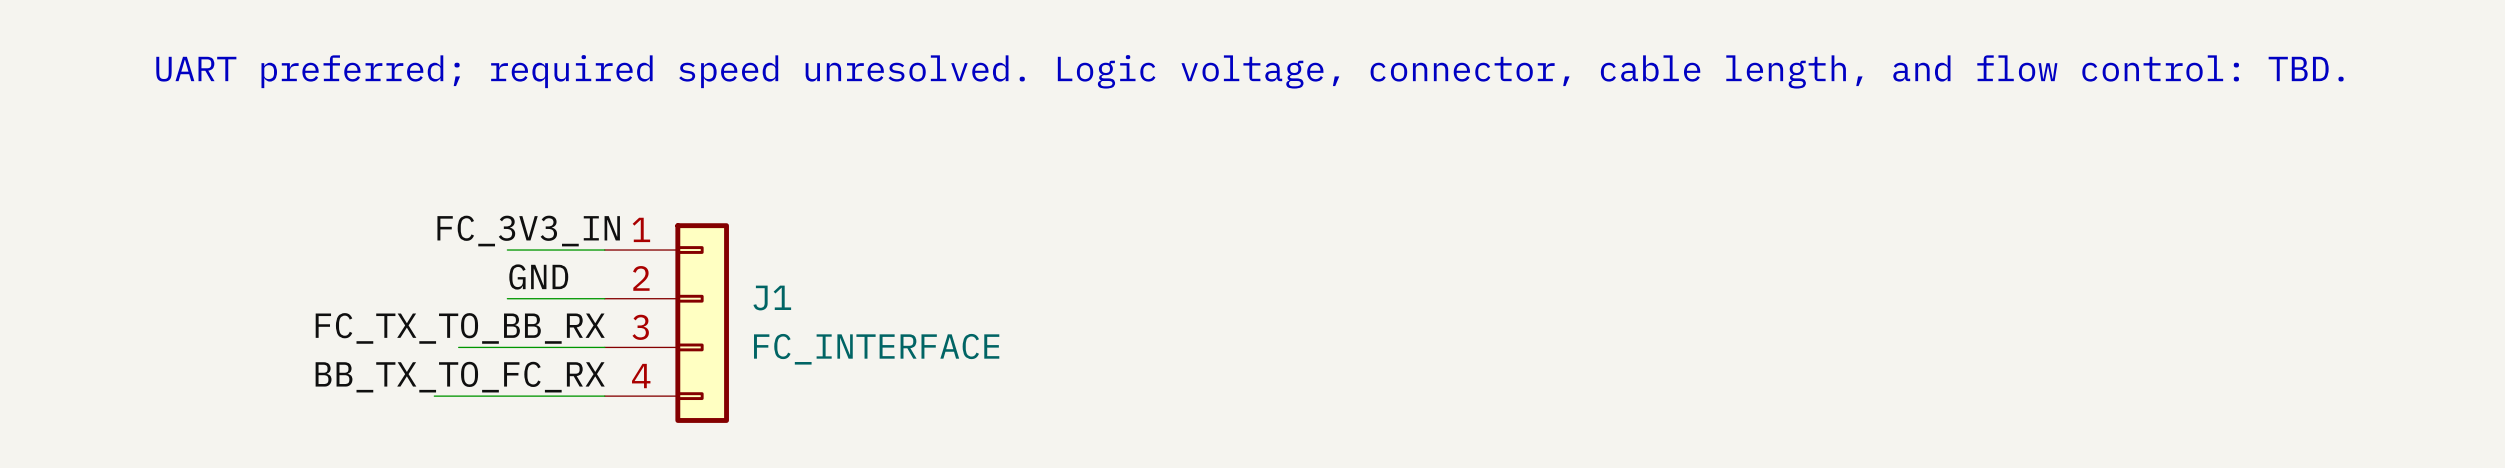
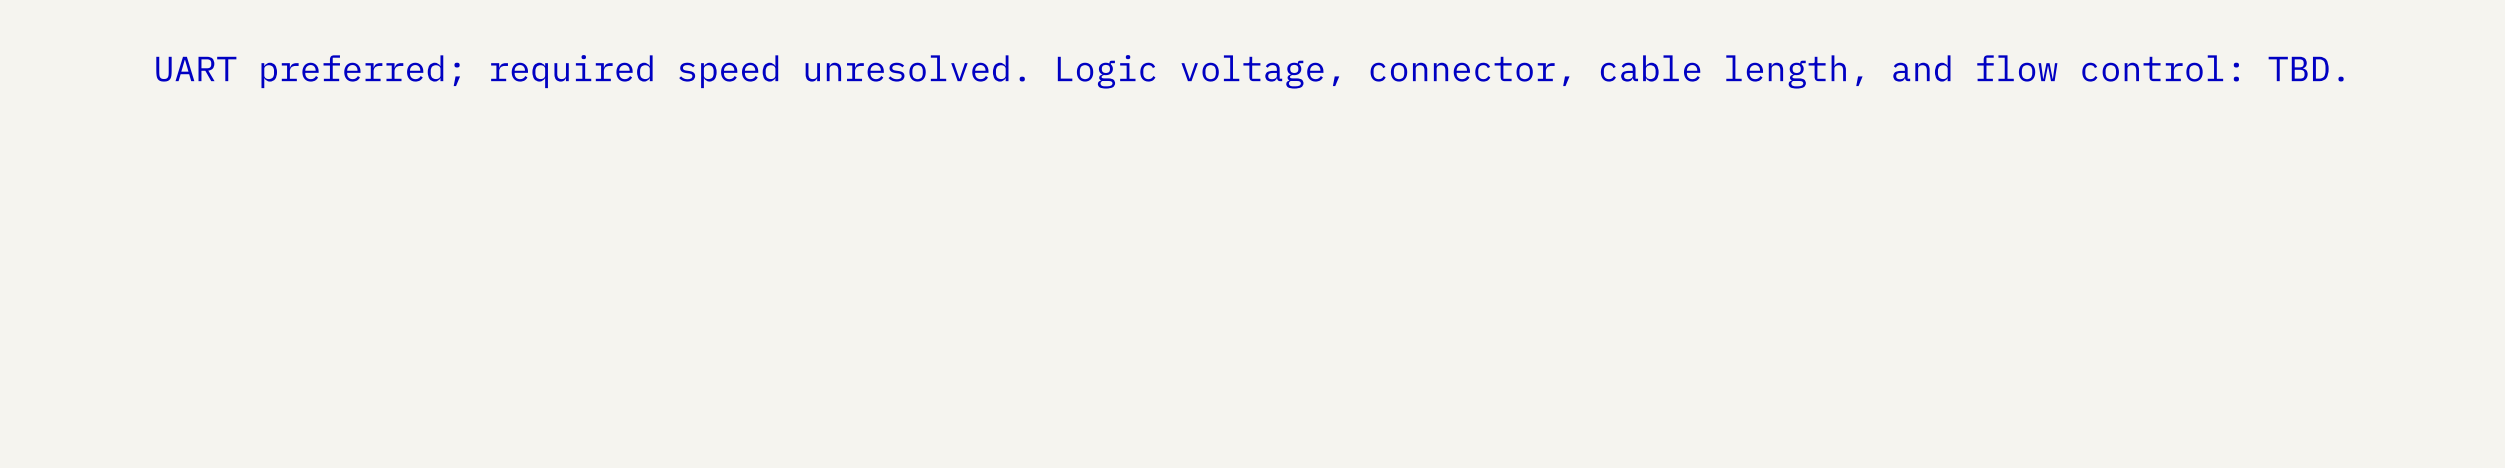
label: FC_3V3_IN (528, 231) -> none
wire: (507, 250) (604, 250) -> none
label: GND (538, 276) -> none
wire: (507, 298) (604, 298) -> none
J1: FC_INTERFACE (666, 323) -> none
label: FC_TX_TO_BB_RX (460, 328) -> none
wire: (458, 347) (604, 347) -> none
label: BB_TX_TO_FC_RX (460, 377) -> none
wire: (434, 396) (604, 396) -> none

